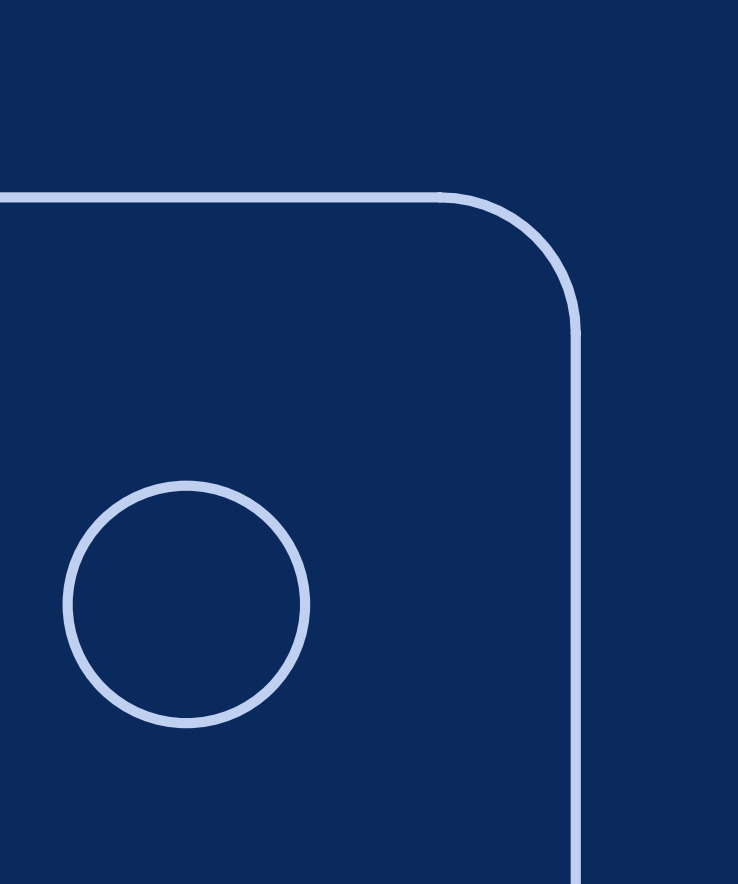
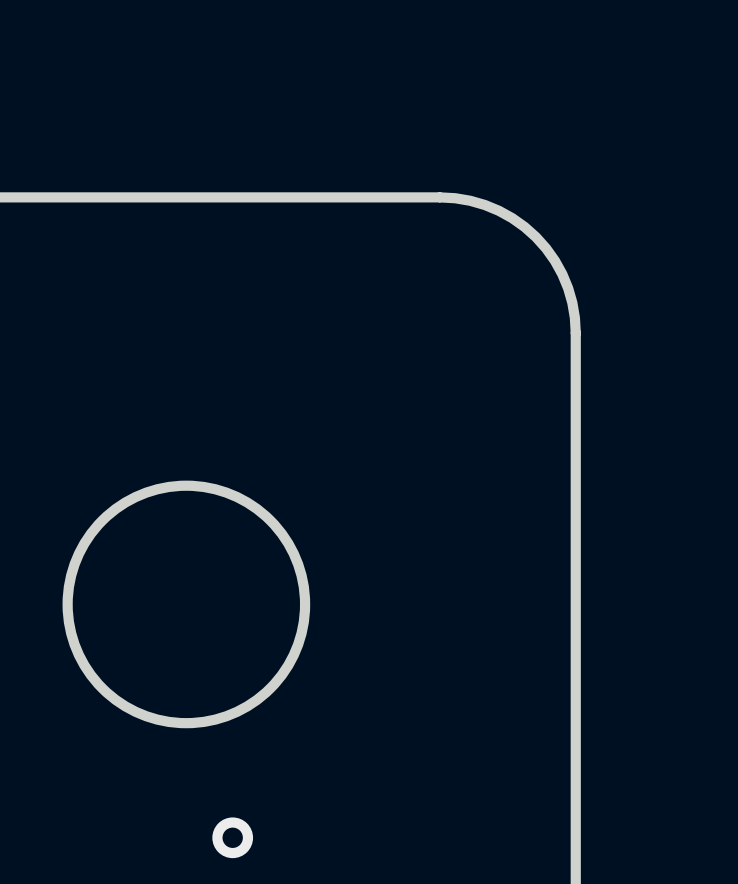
via: none -> (232, 837)

